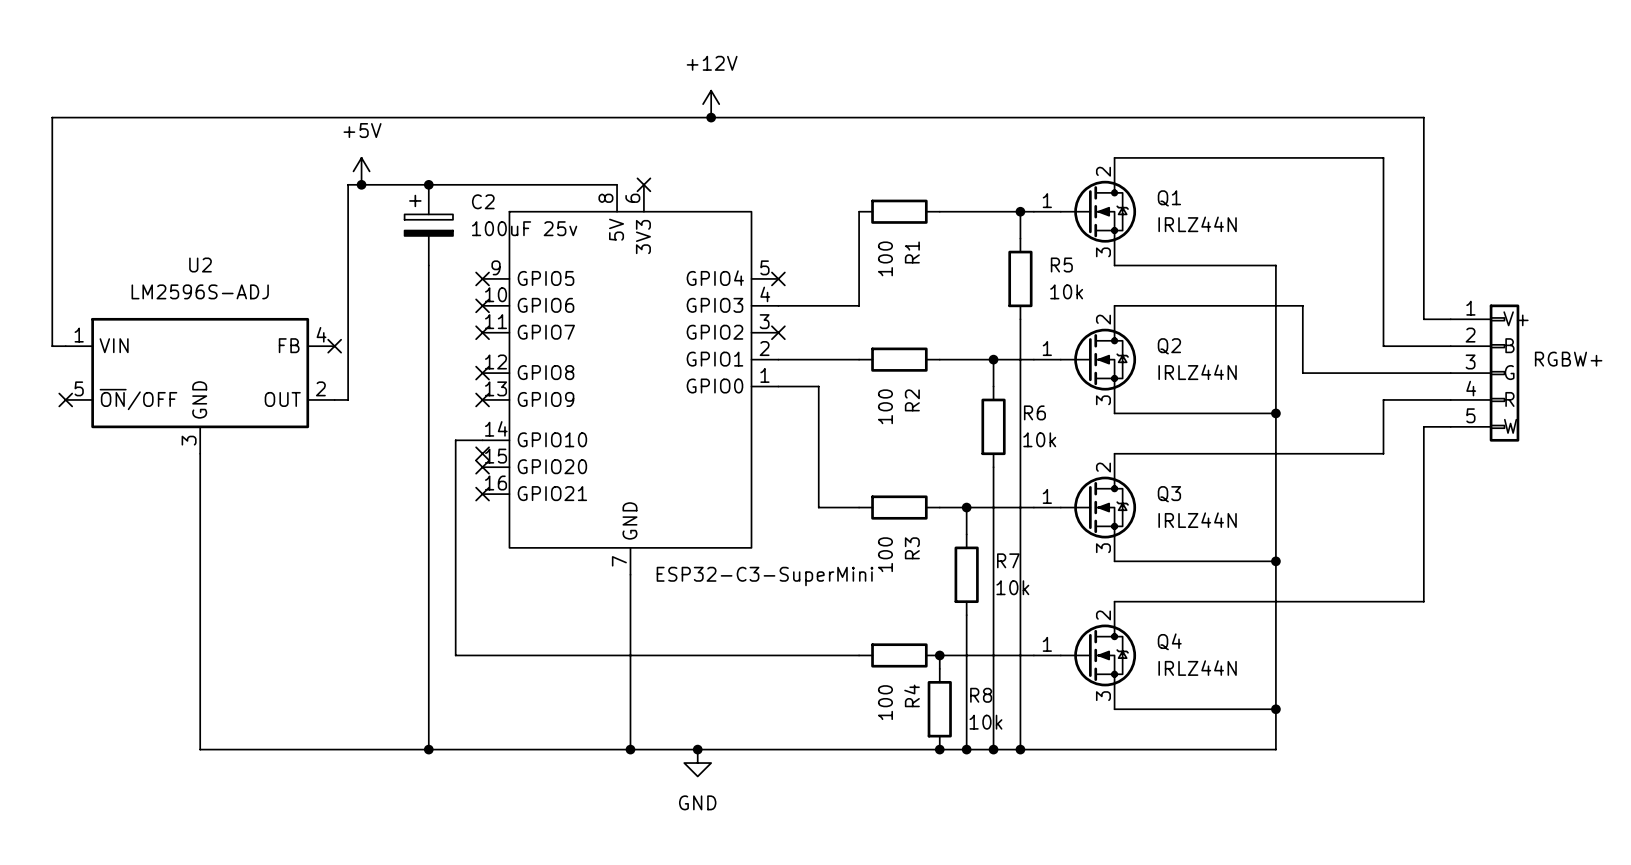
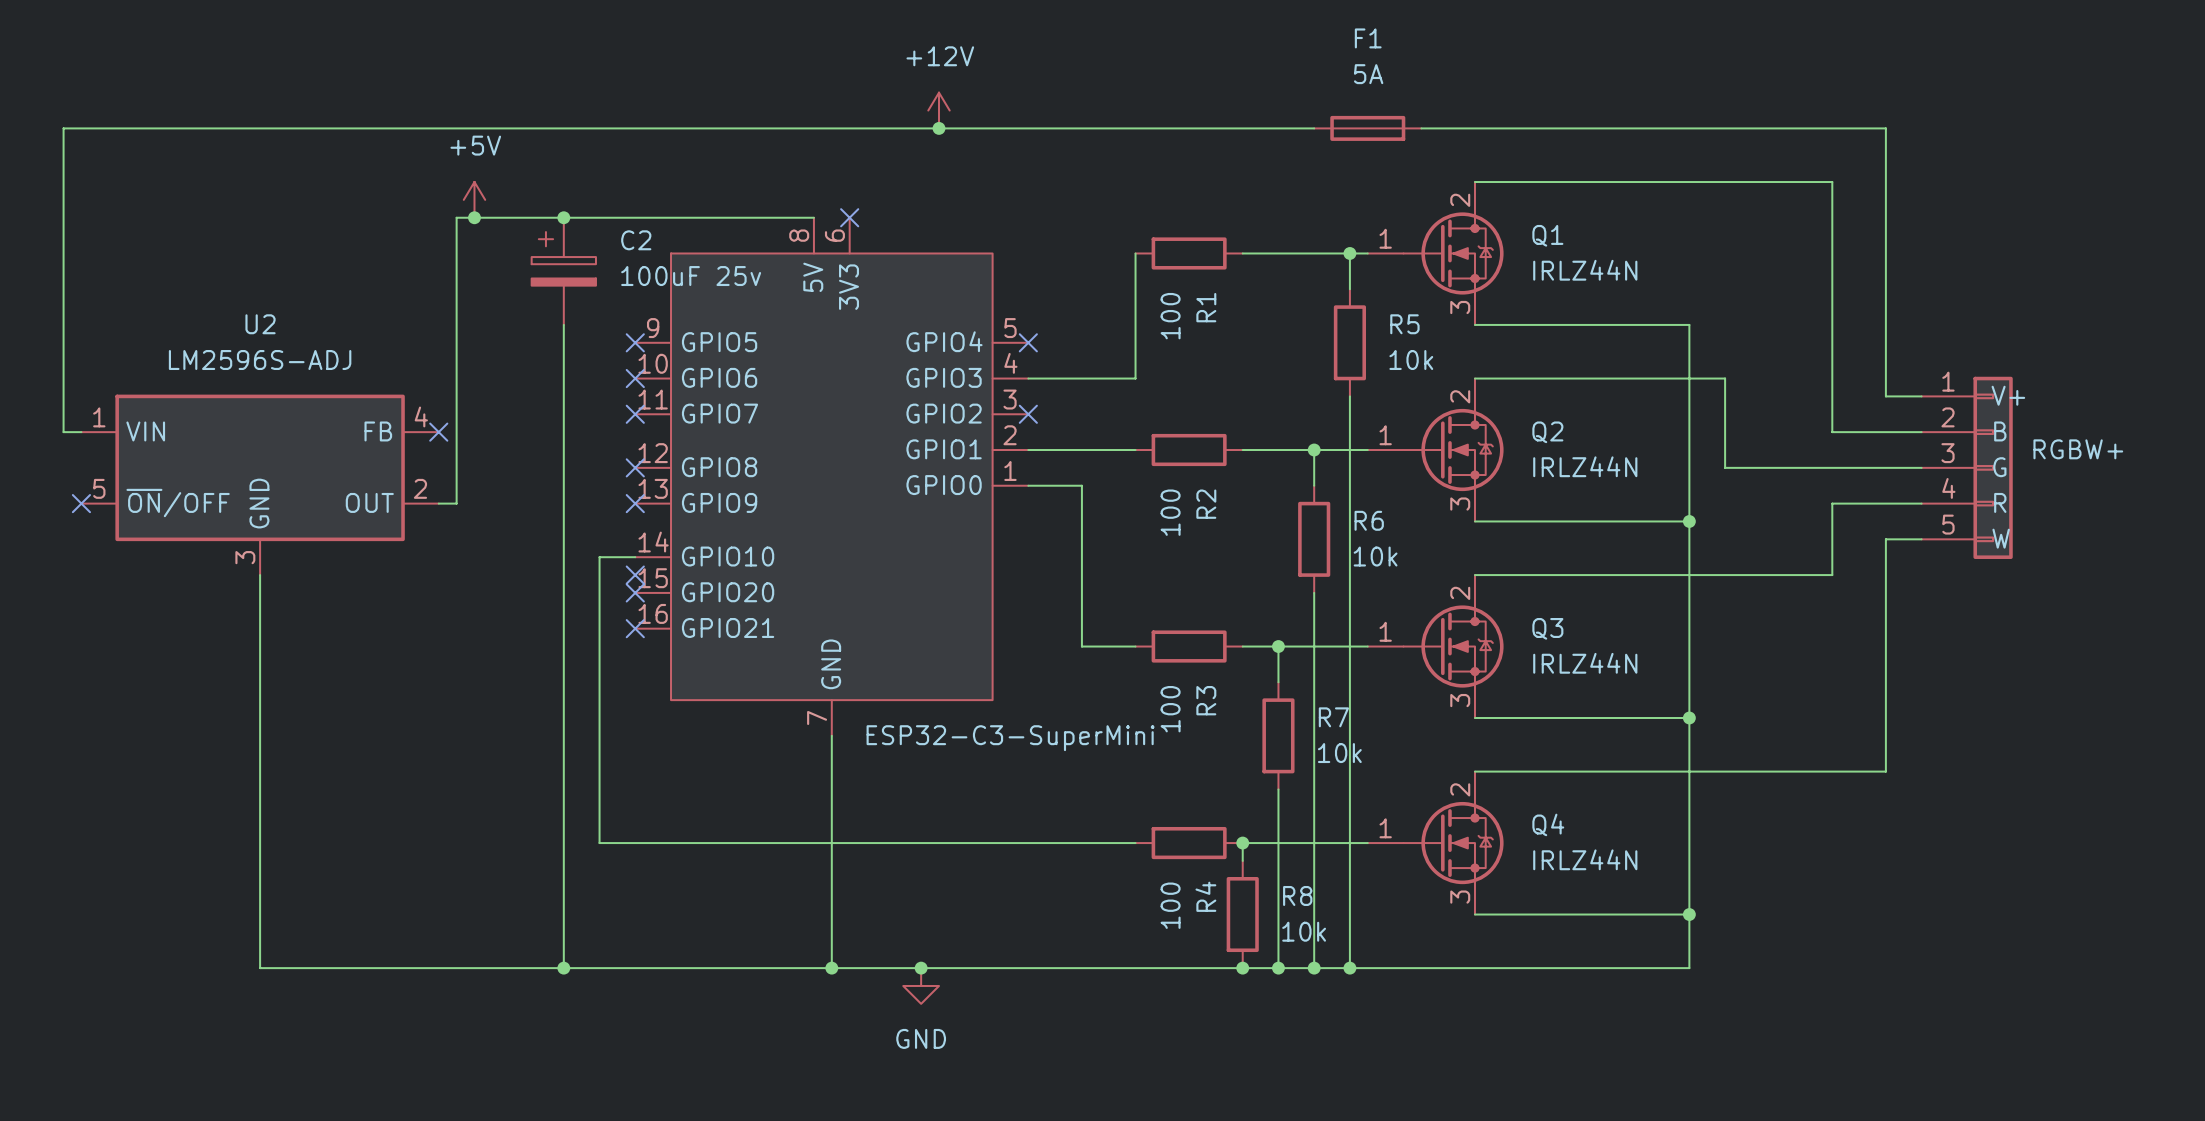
F1: none -> 5A (1367, 128)

